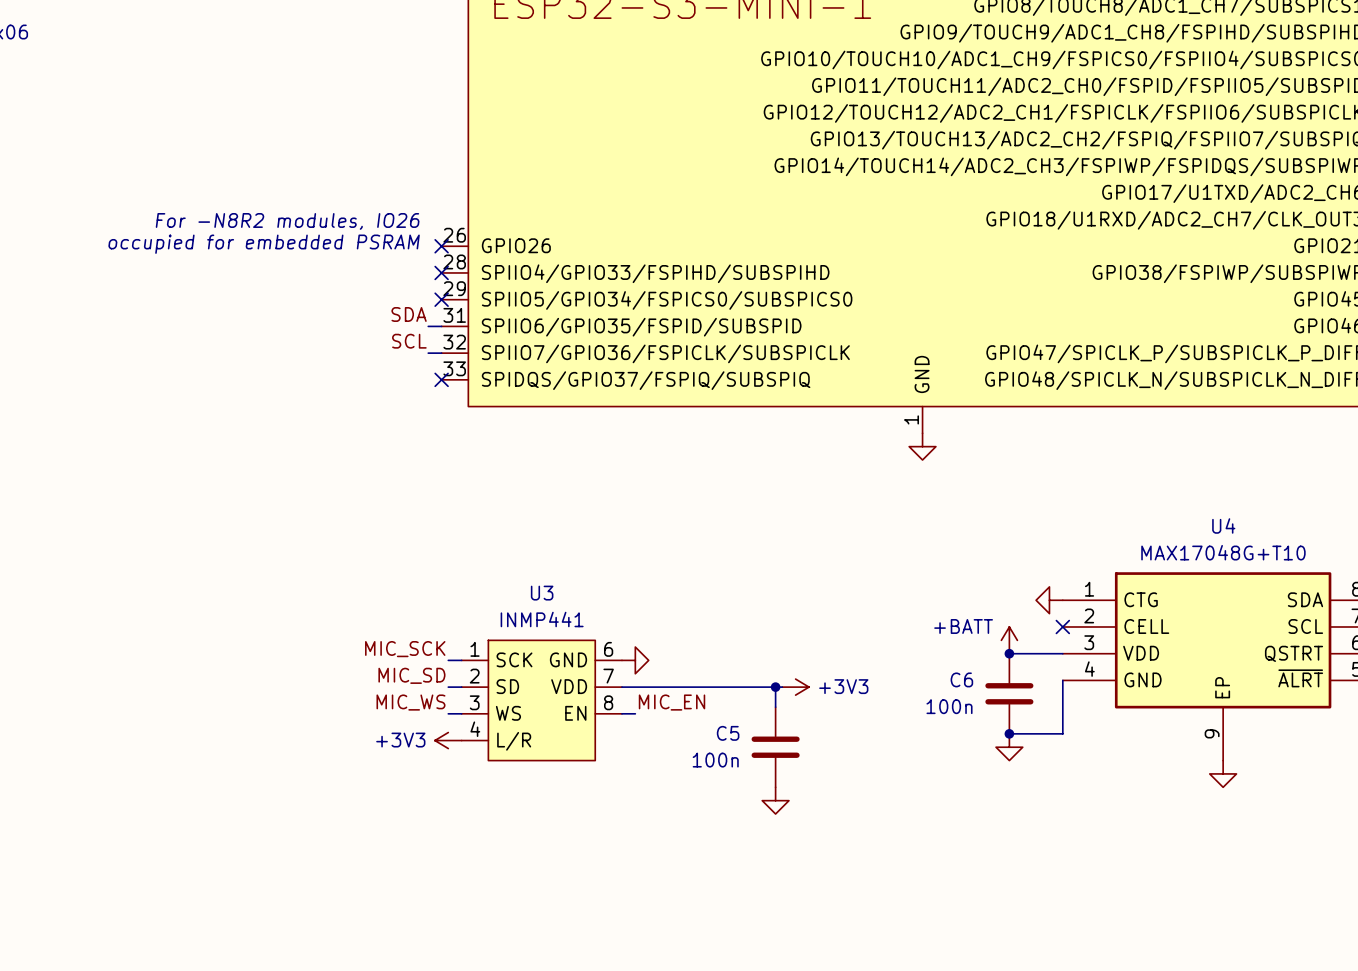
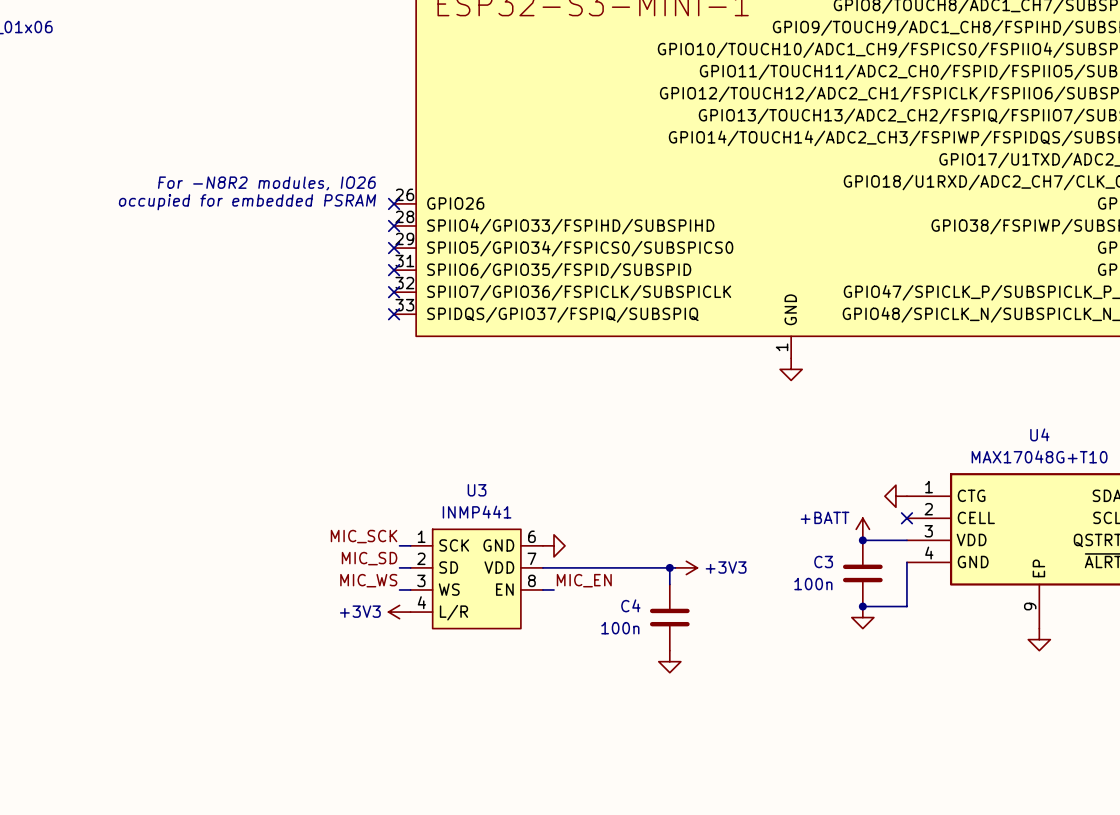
label: SDA (409, 314) -> none
wire: (428, 326) (441, 326) -> none
no-connect mark: none -> (394, 270)
label: SCL (409, 341) -> none
wire: (428, 353) (441, 353) -> none
no-connect mark: none -> (394, 292)
C6 name: C6 (961, 679) -> C3 (823, 562)
C5 name: C5 (728, 733) -> C4 (630, 605)

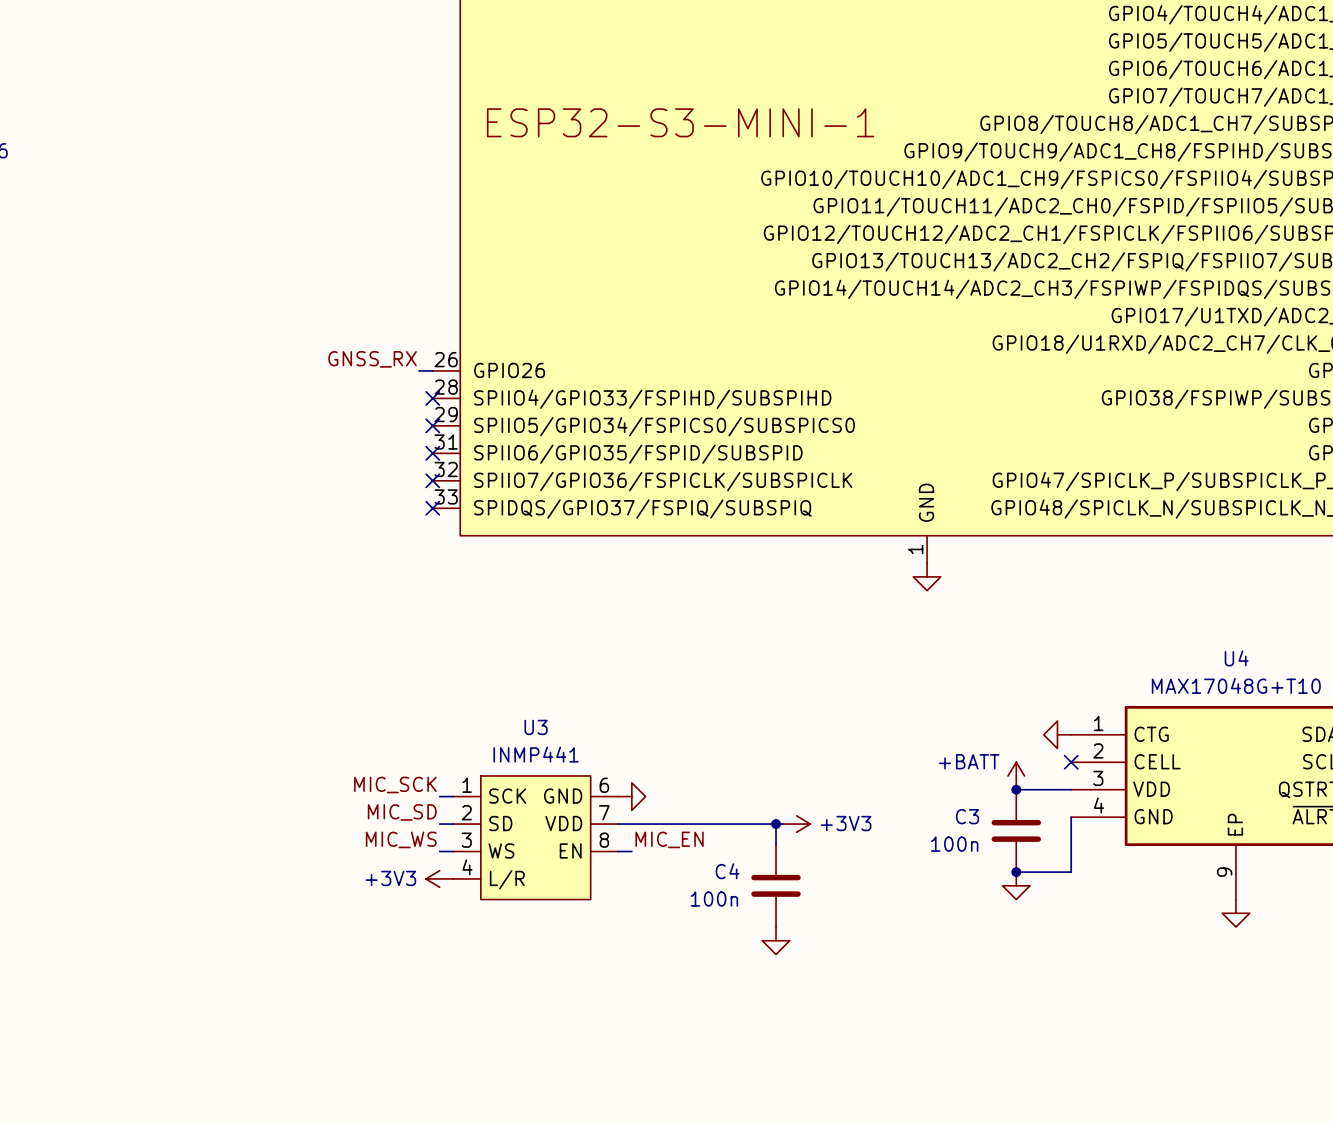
text: For -N8R2 modules, IO26 (266, 183) -> none
label: none -> GNSS_RX (372, 359)
text: occupied for embedded PSRAM (247, 202) -> none
wire: none -> (419, 370) (432, 370)
no-connect mark: (394, 203) -> none

